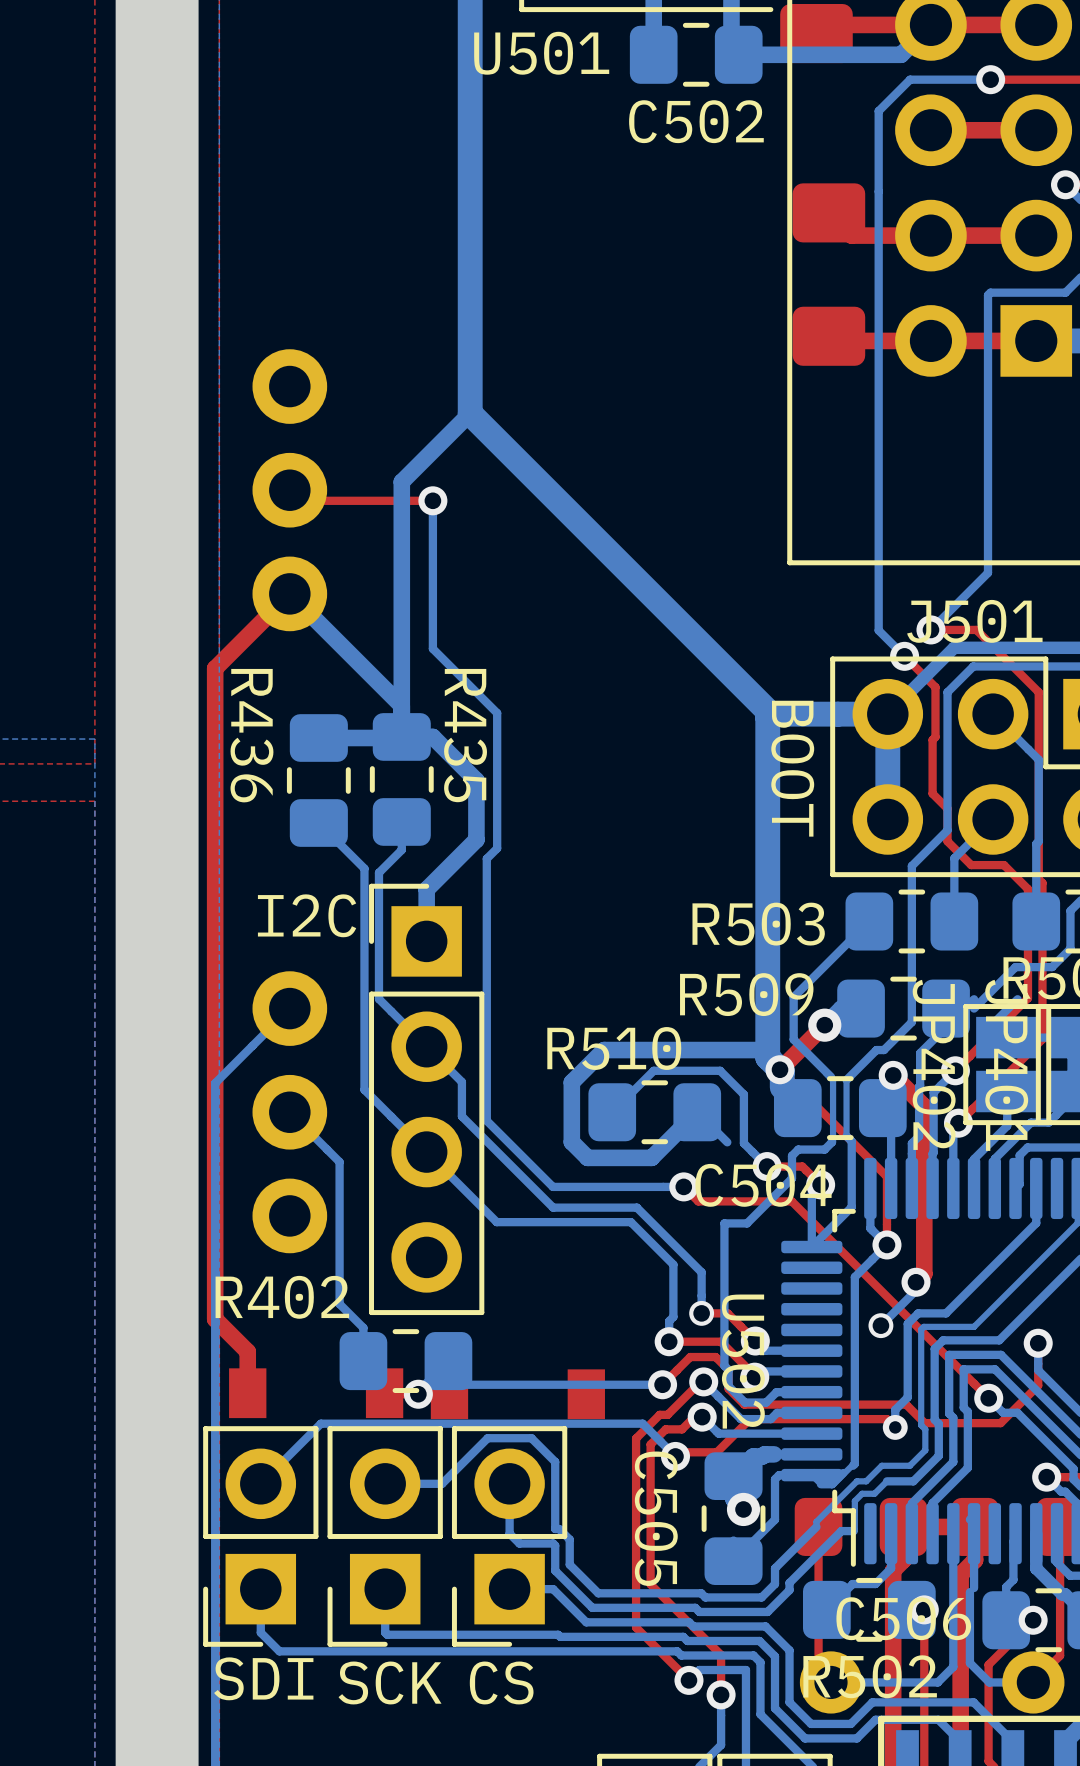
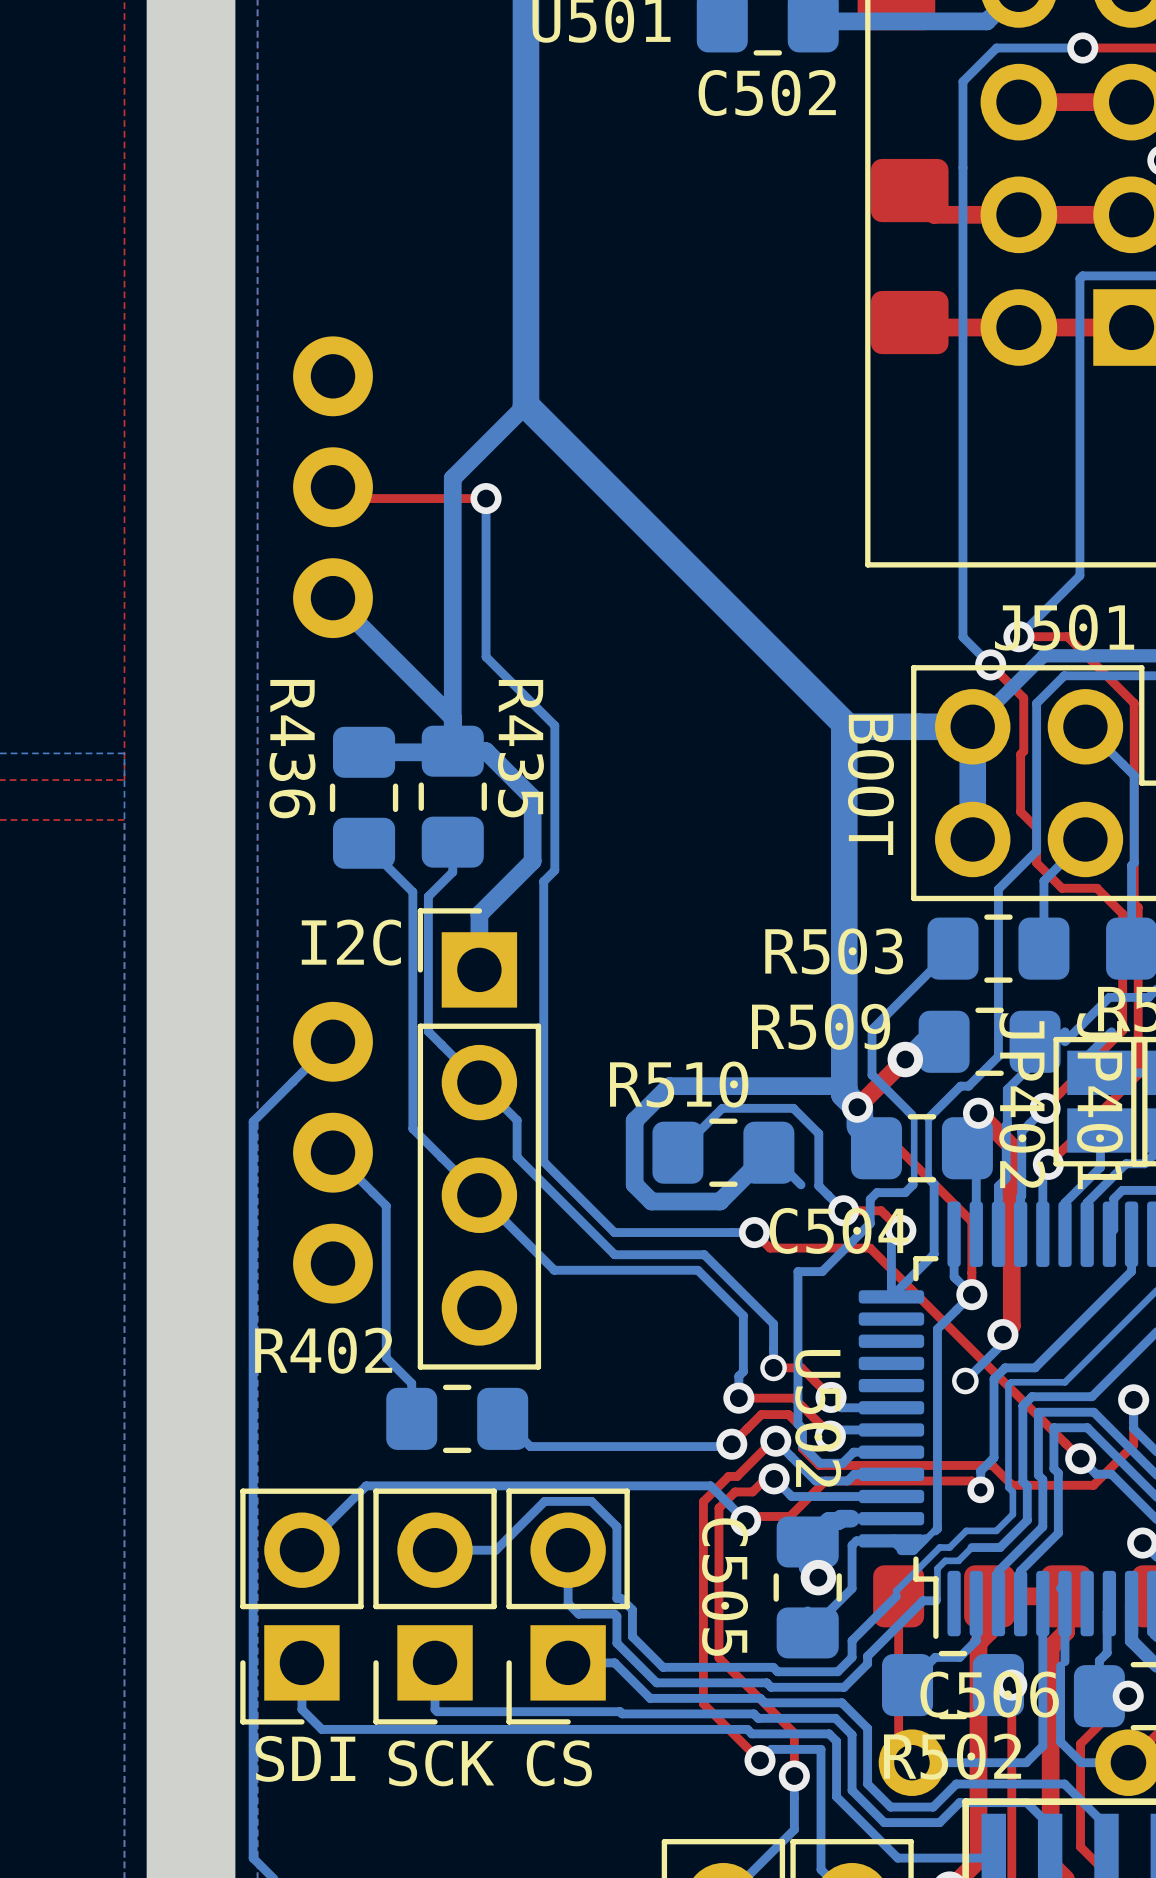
top track: (289, 593) (215, 668) (215, 1319) (247, 1351) (247, 1393) -> none
bottom track: (448, 1361) (418, 1391) (418, 1394) (427, 1384) (662, 1384) -> (502, 1418) (530, 1446) (729, 1446) (731, 1444)
part: (316, 1393) -> none
via: (418, 1394) -> none
part: (517, 1394) -> none

